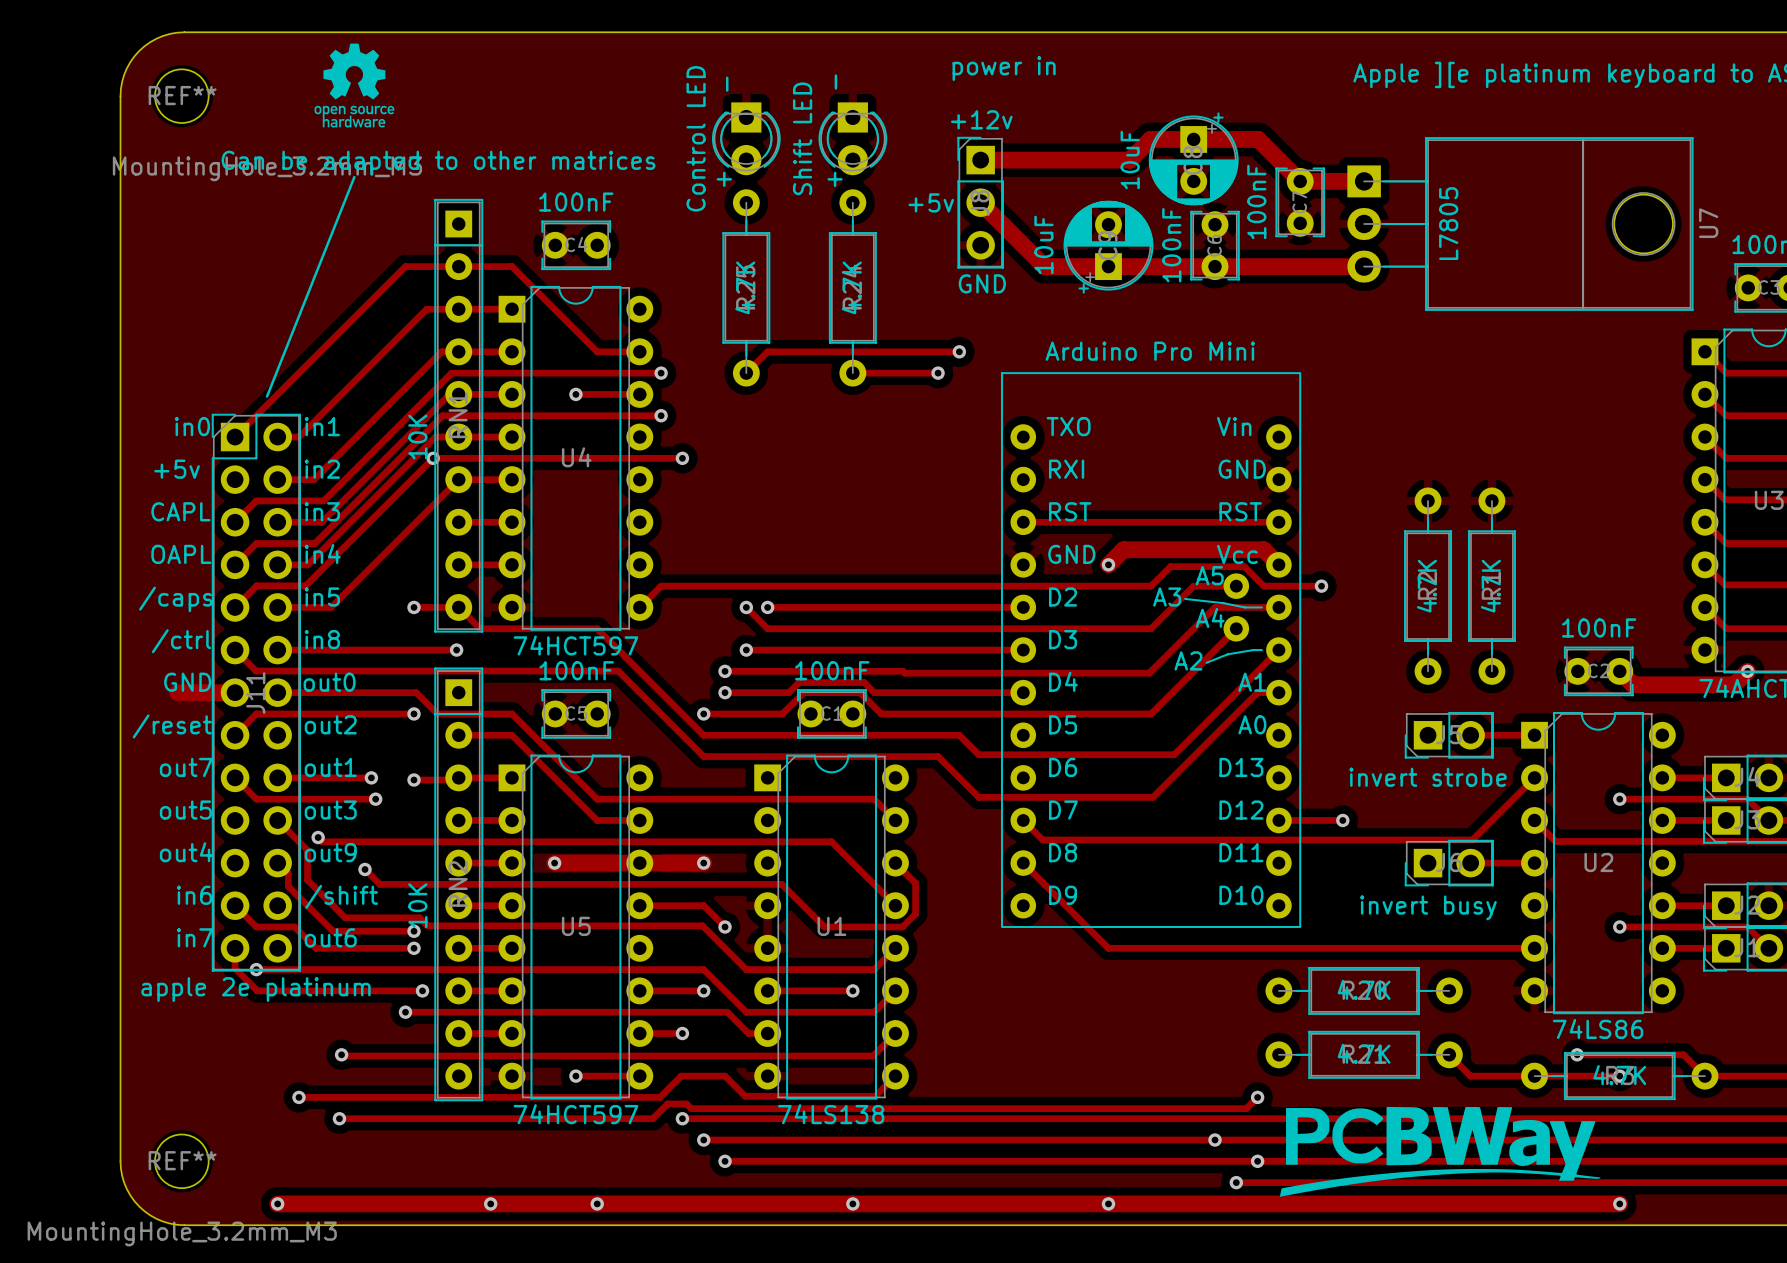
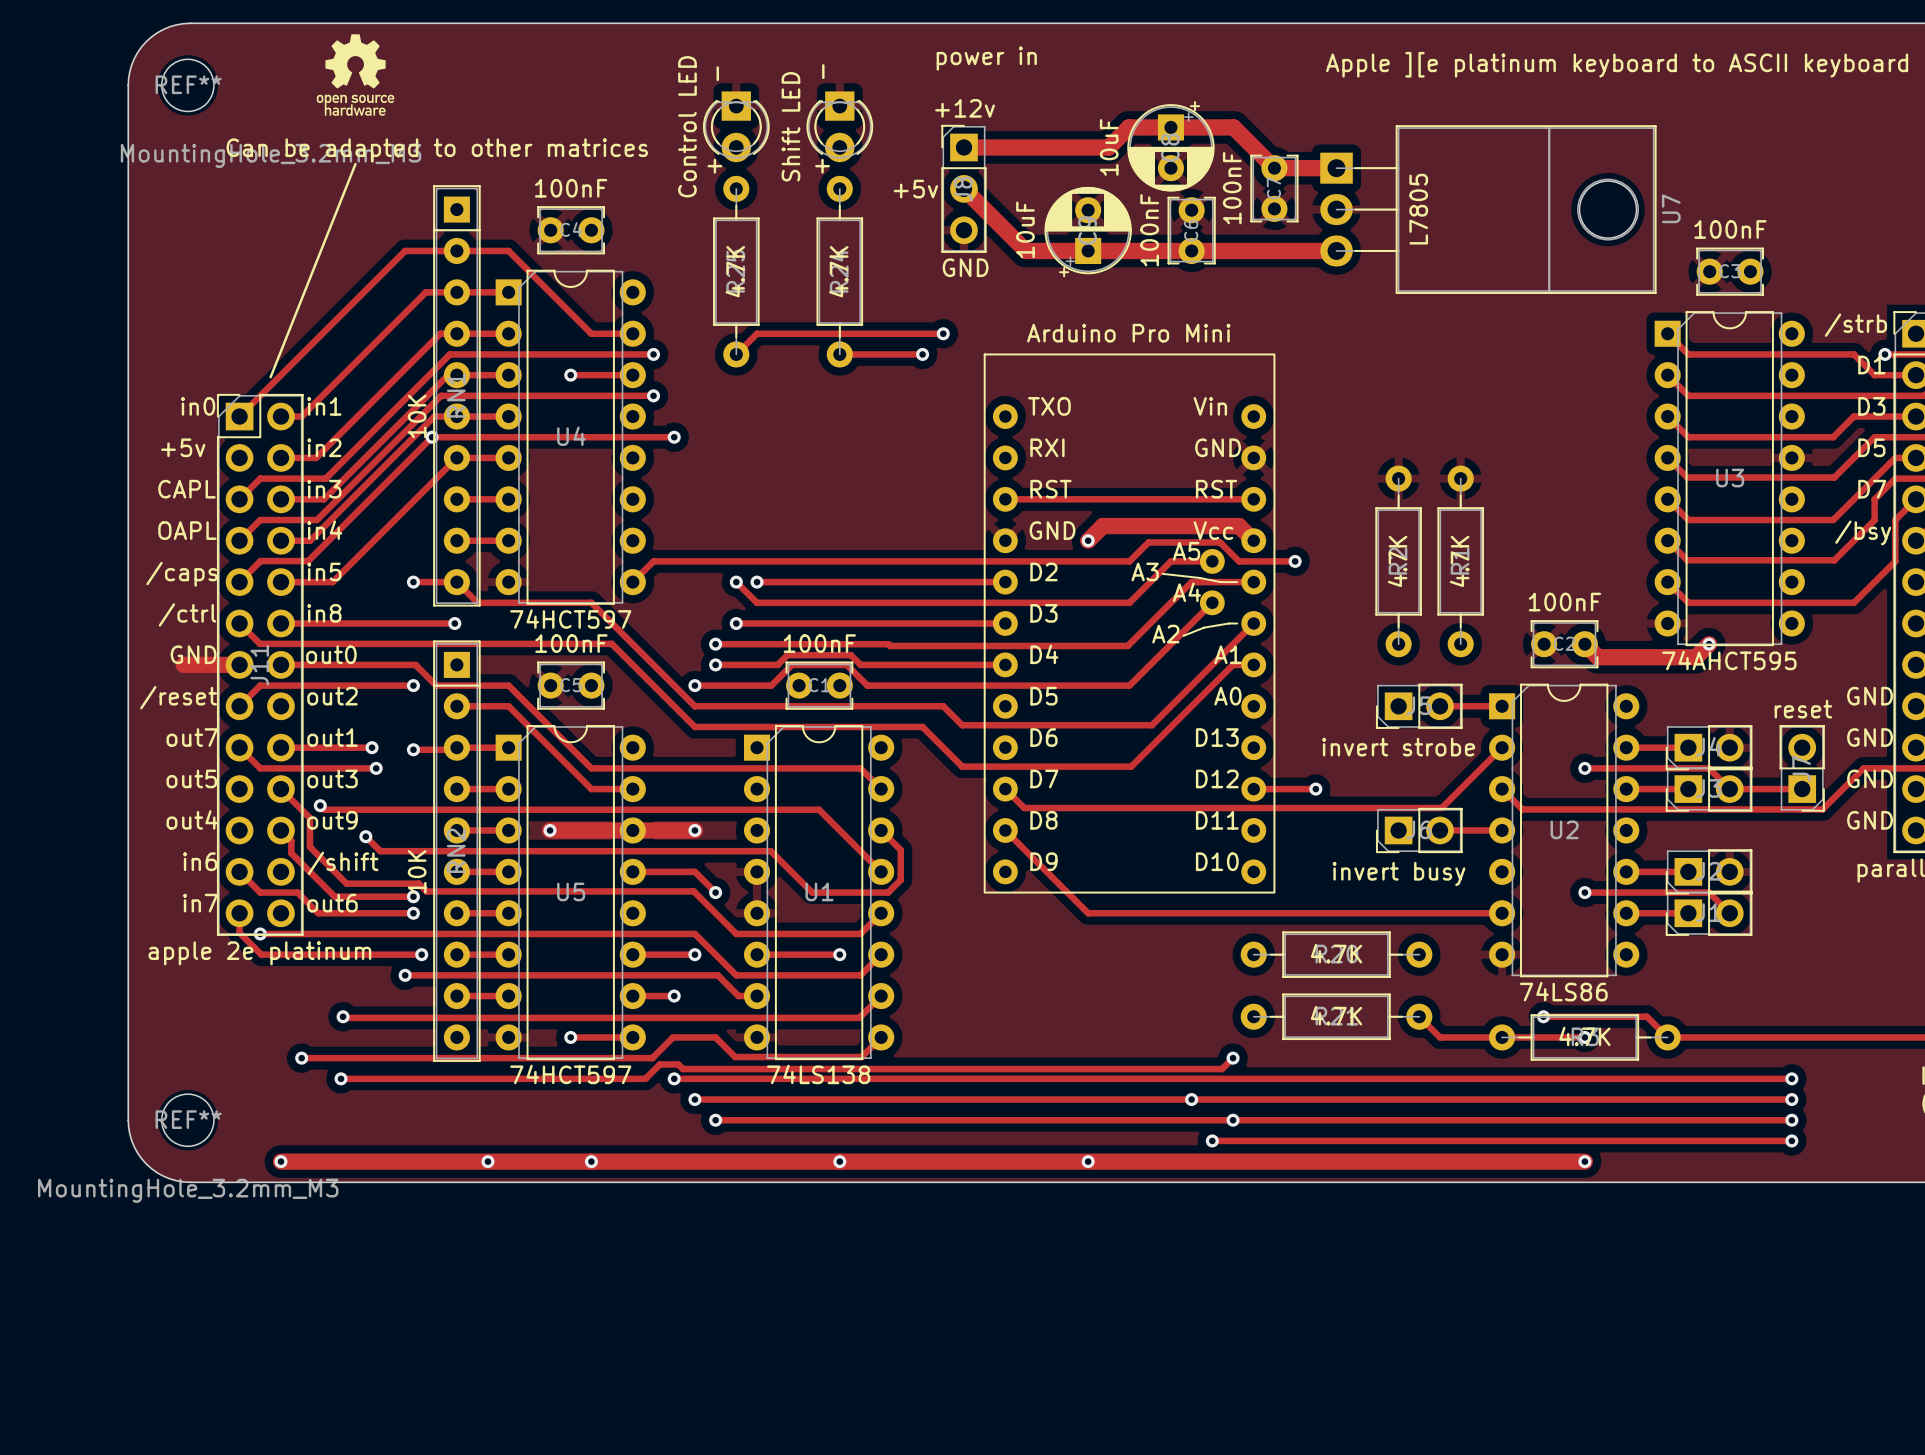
drawing: [1279, 1106, 1601, 1197] -> none

